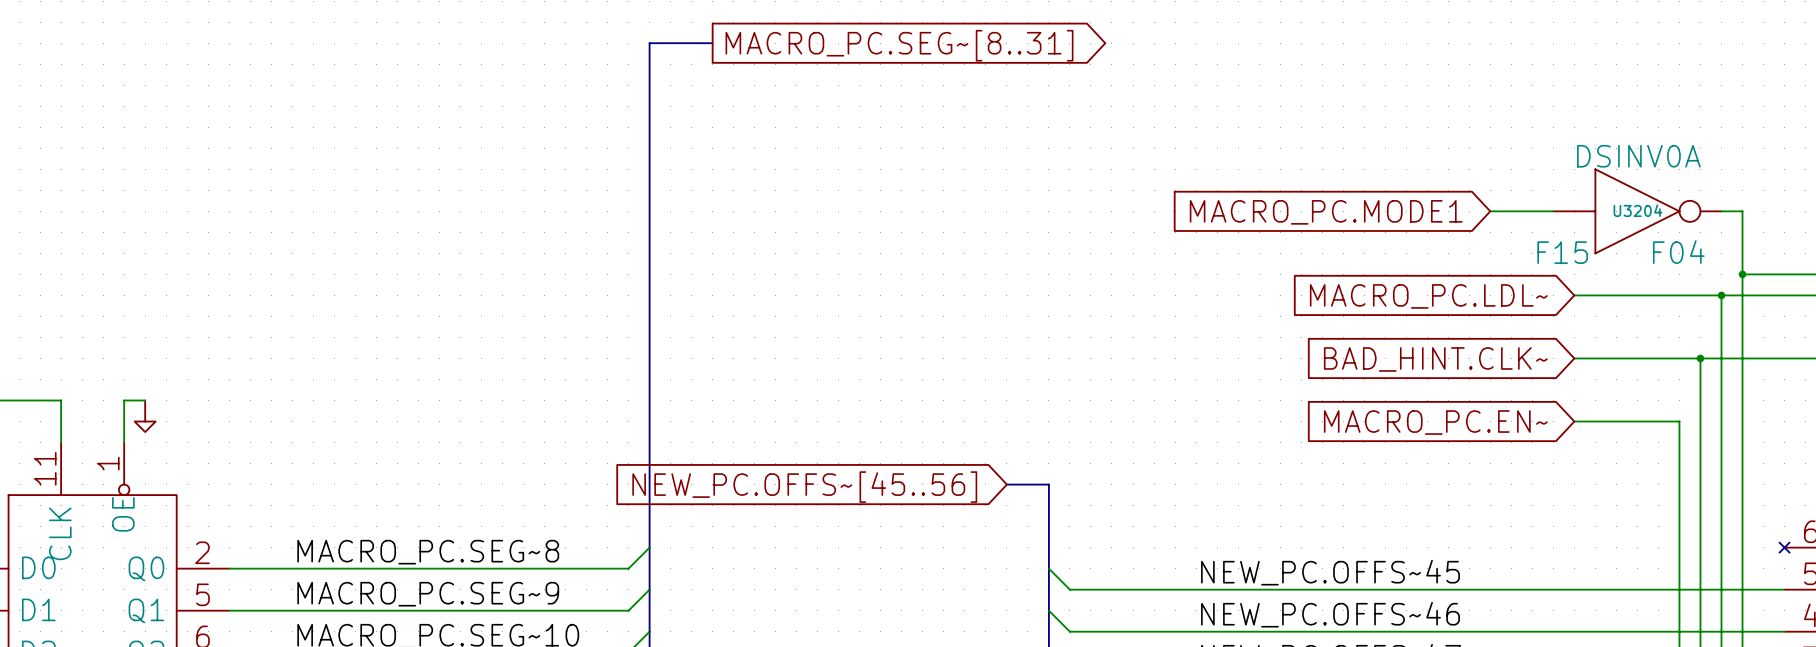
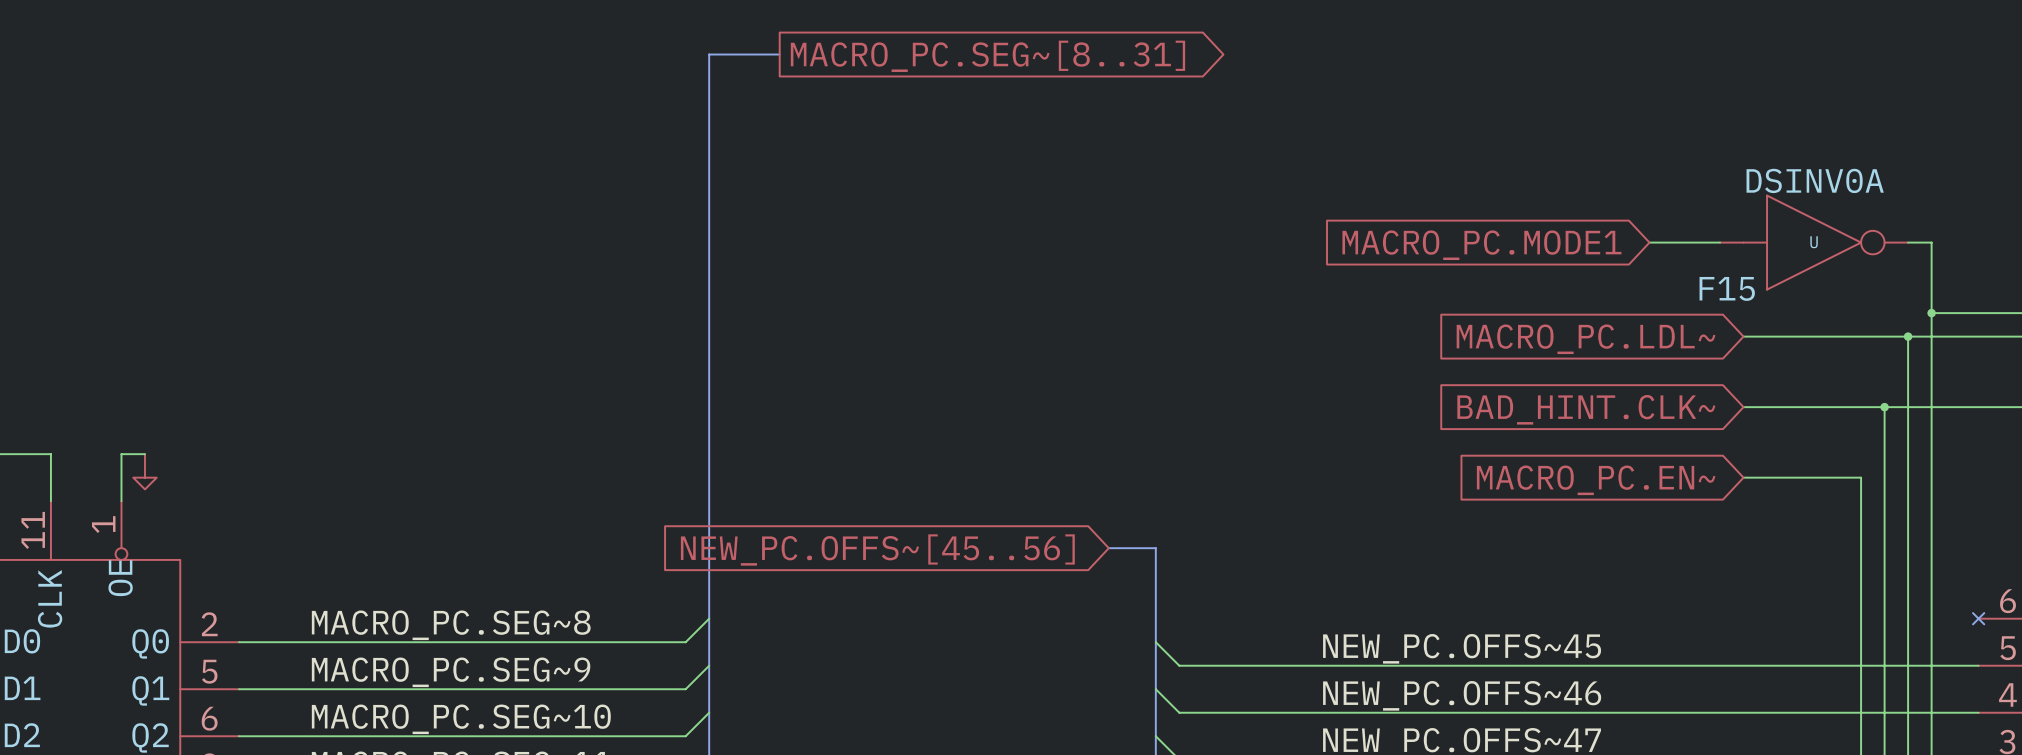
U3204 name: U3204 (1637, 210) -> U (1814, 242)
U3204 value: F04 (1678, 252) -> none

